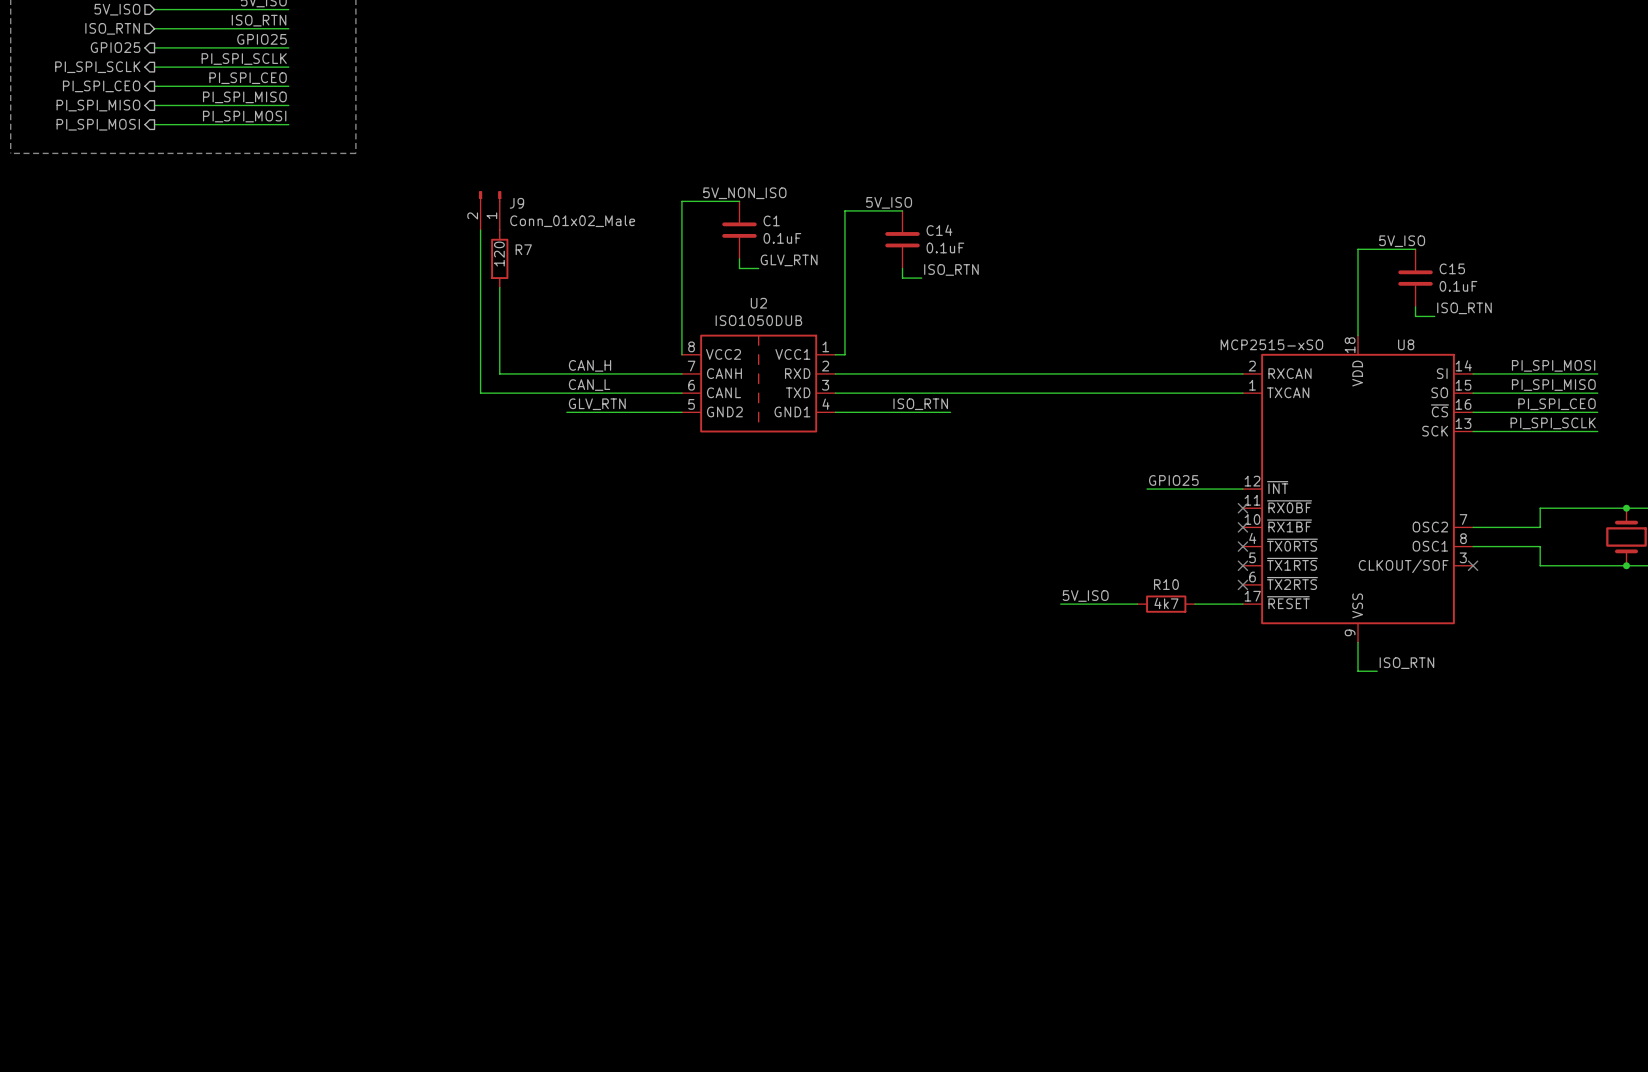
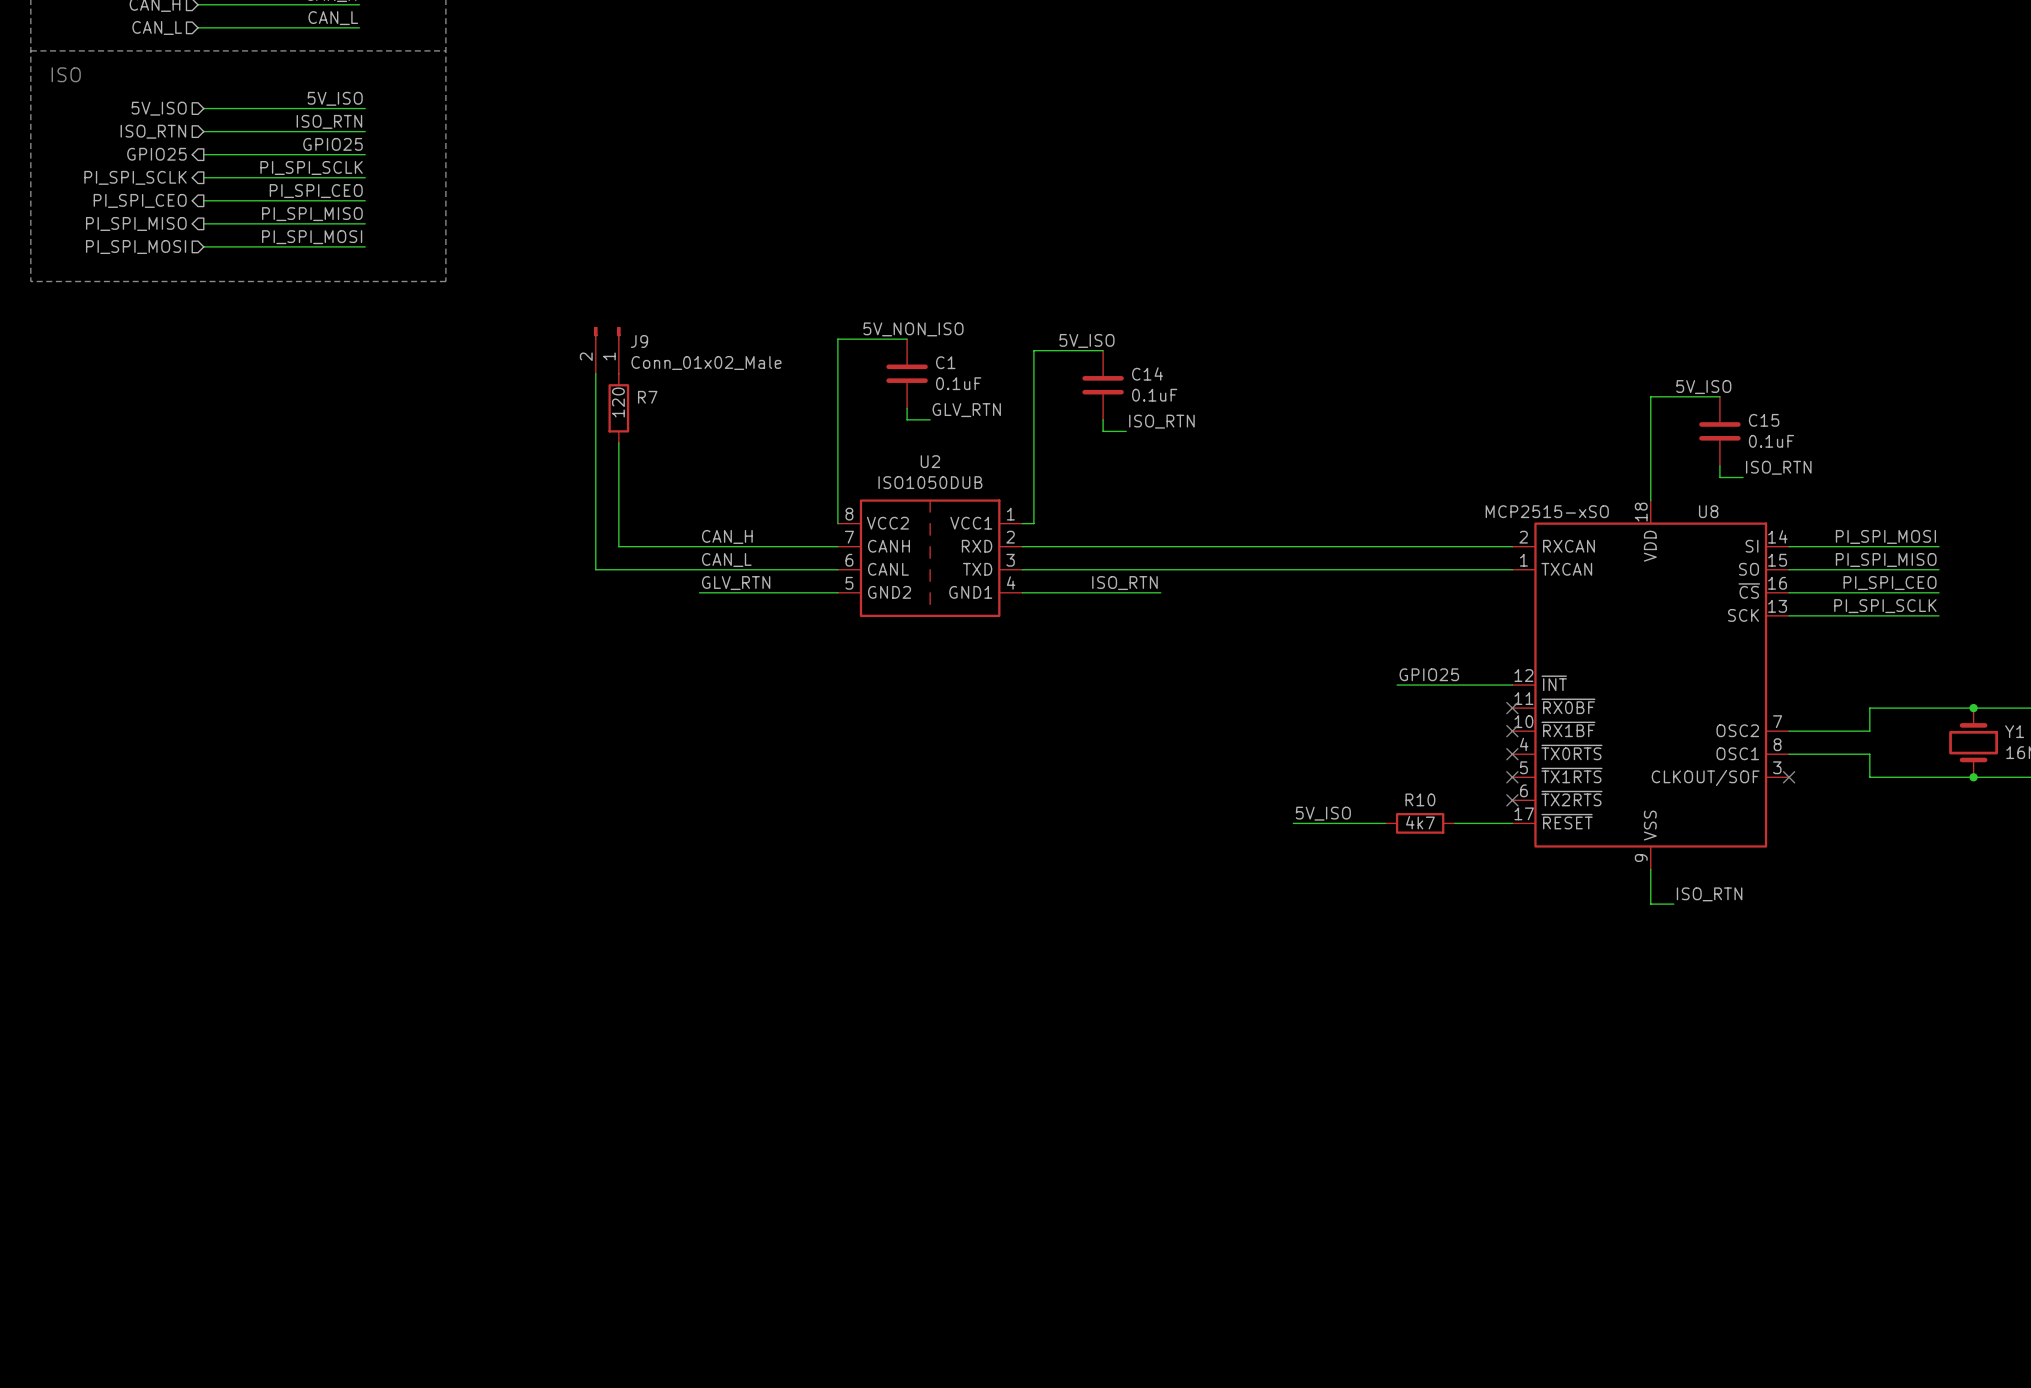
hierarchical label shape: output (98, 124) -> input (136, 247)

